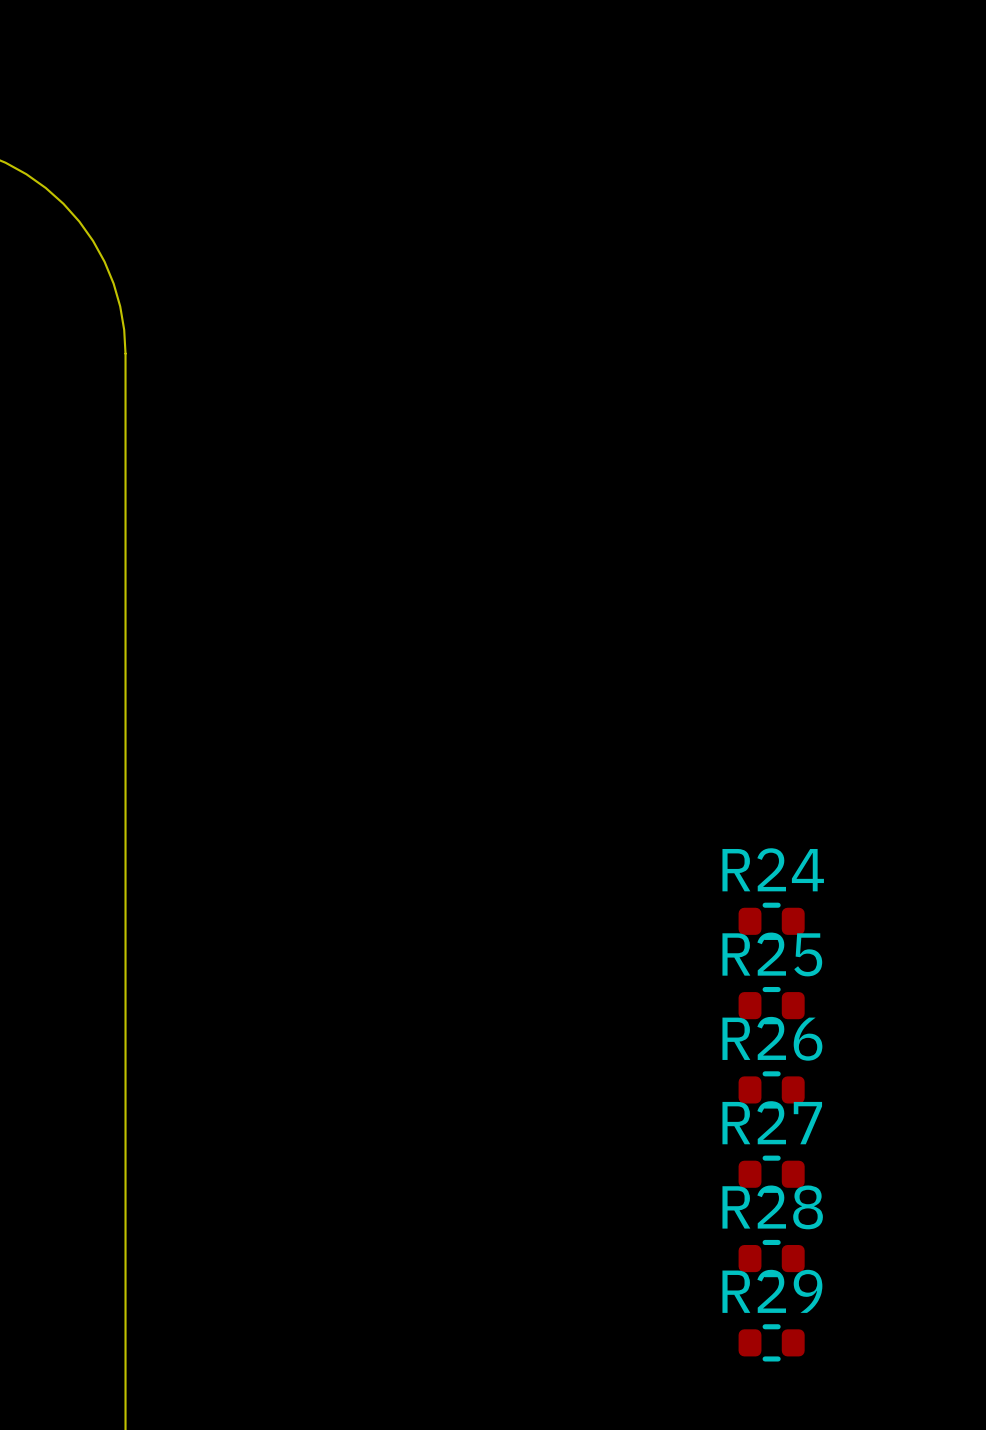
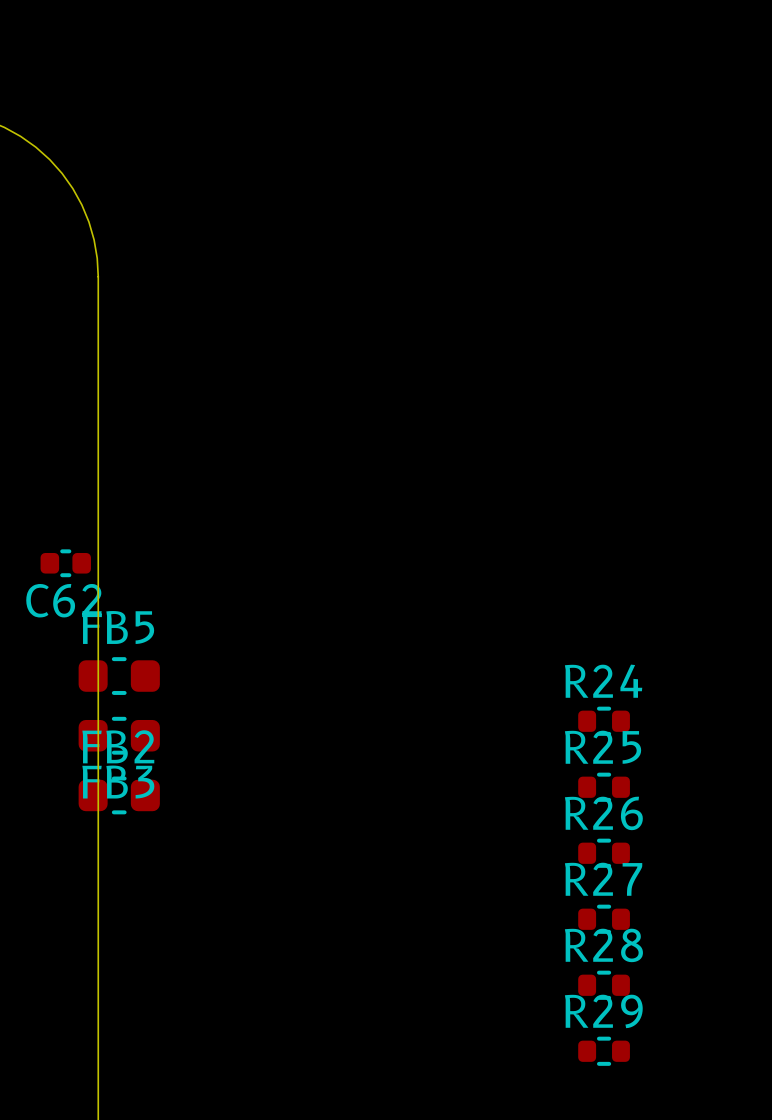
C62: none -> (65, 563)
FB5: none -> (119, 676)
FB3: none -> (119, 735)
FB2: none -> (119, 795)

